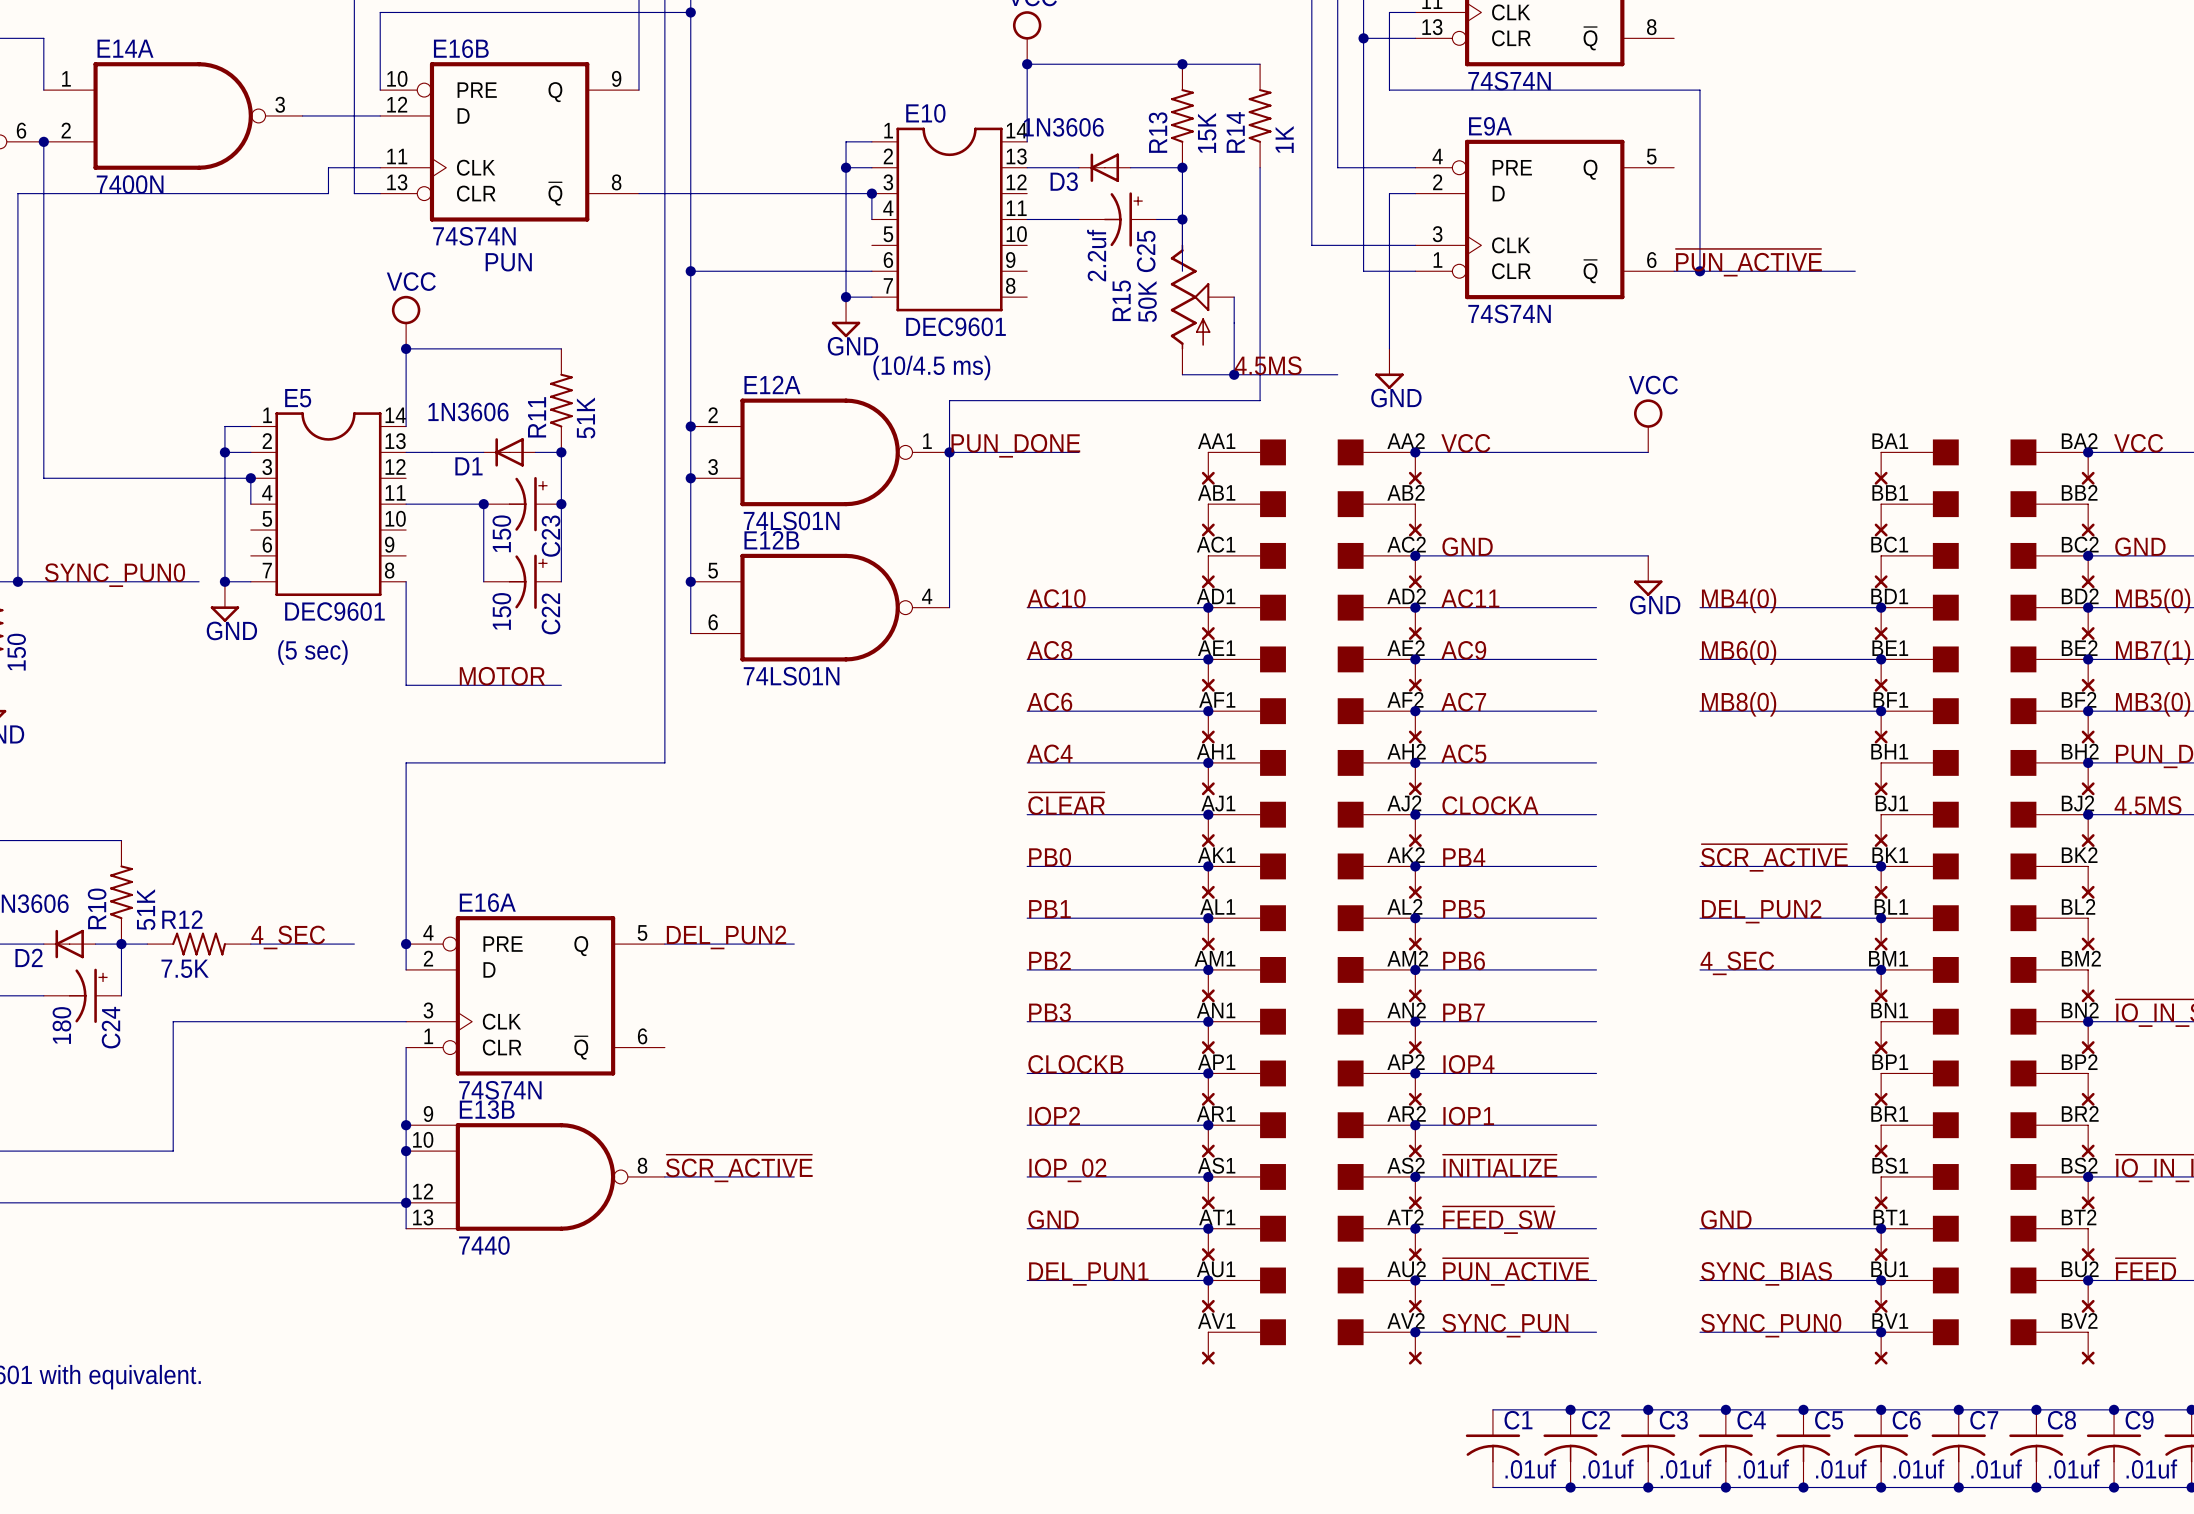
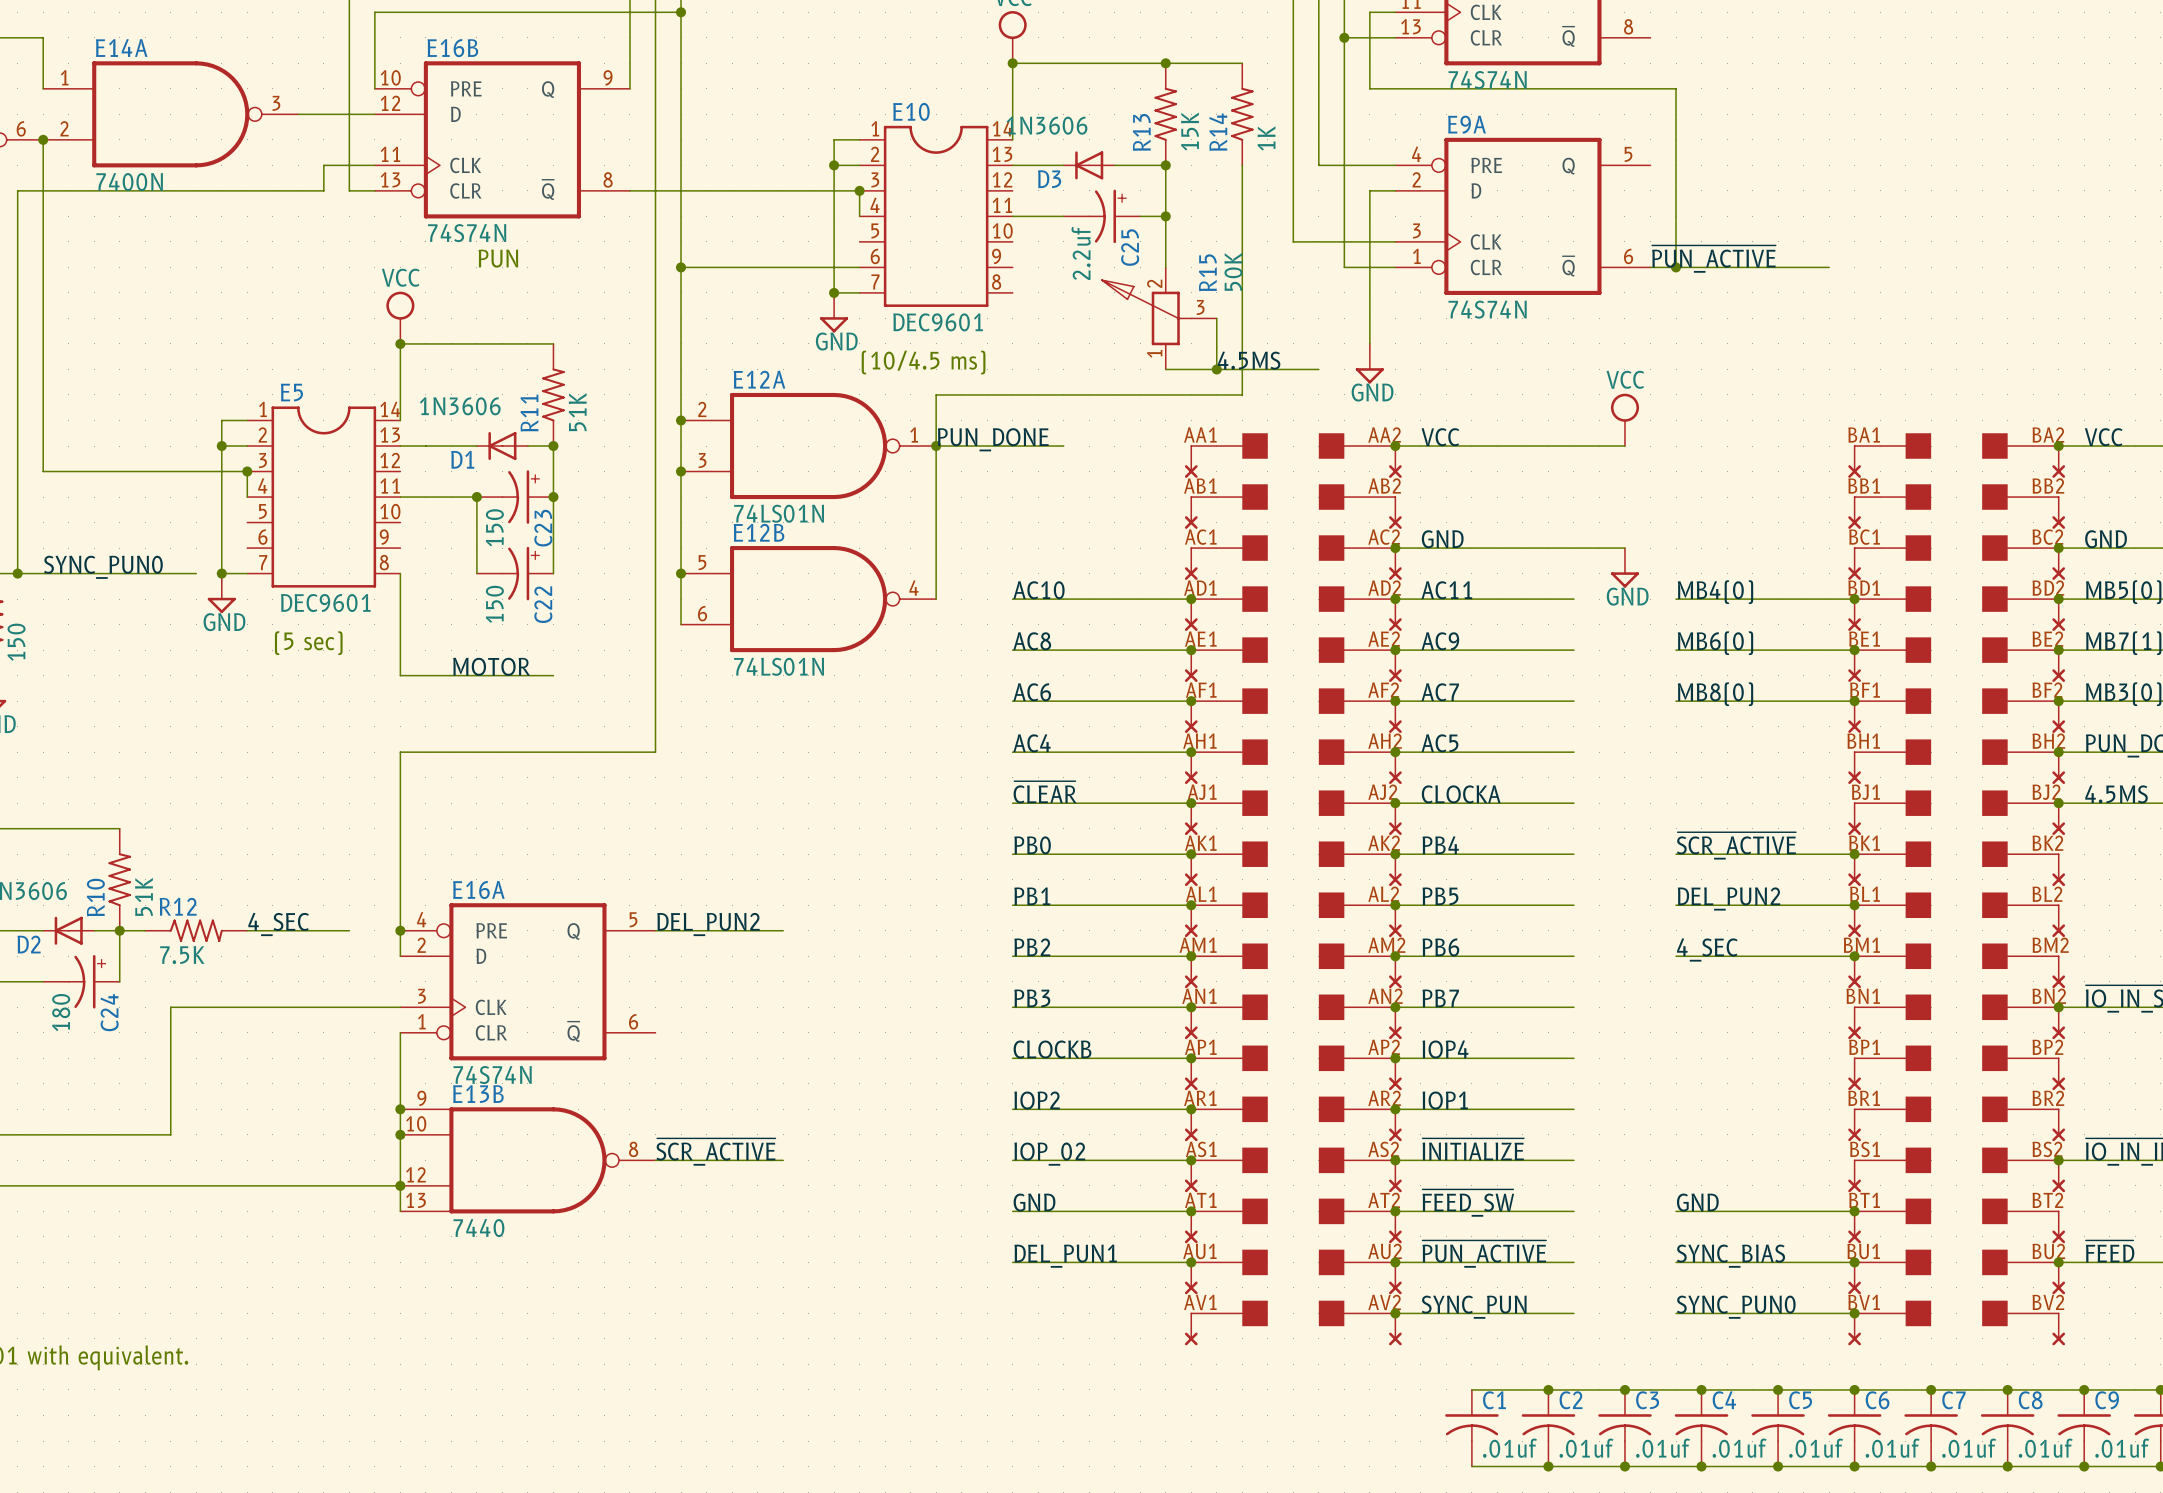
R15 symbol: [1170, 219, 1235, 375] -> [1101, 267, 1217, 370]
wire: (1234, 297) (1234, 323) -> none
R15 name position: R15 (1121, 300) -> R15 (1207, 272)
R15 value position: 50K (1147, 301) -> 50K (1233, 271)

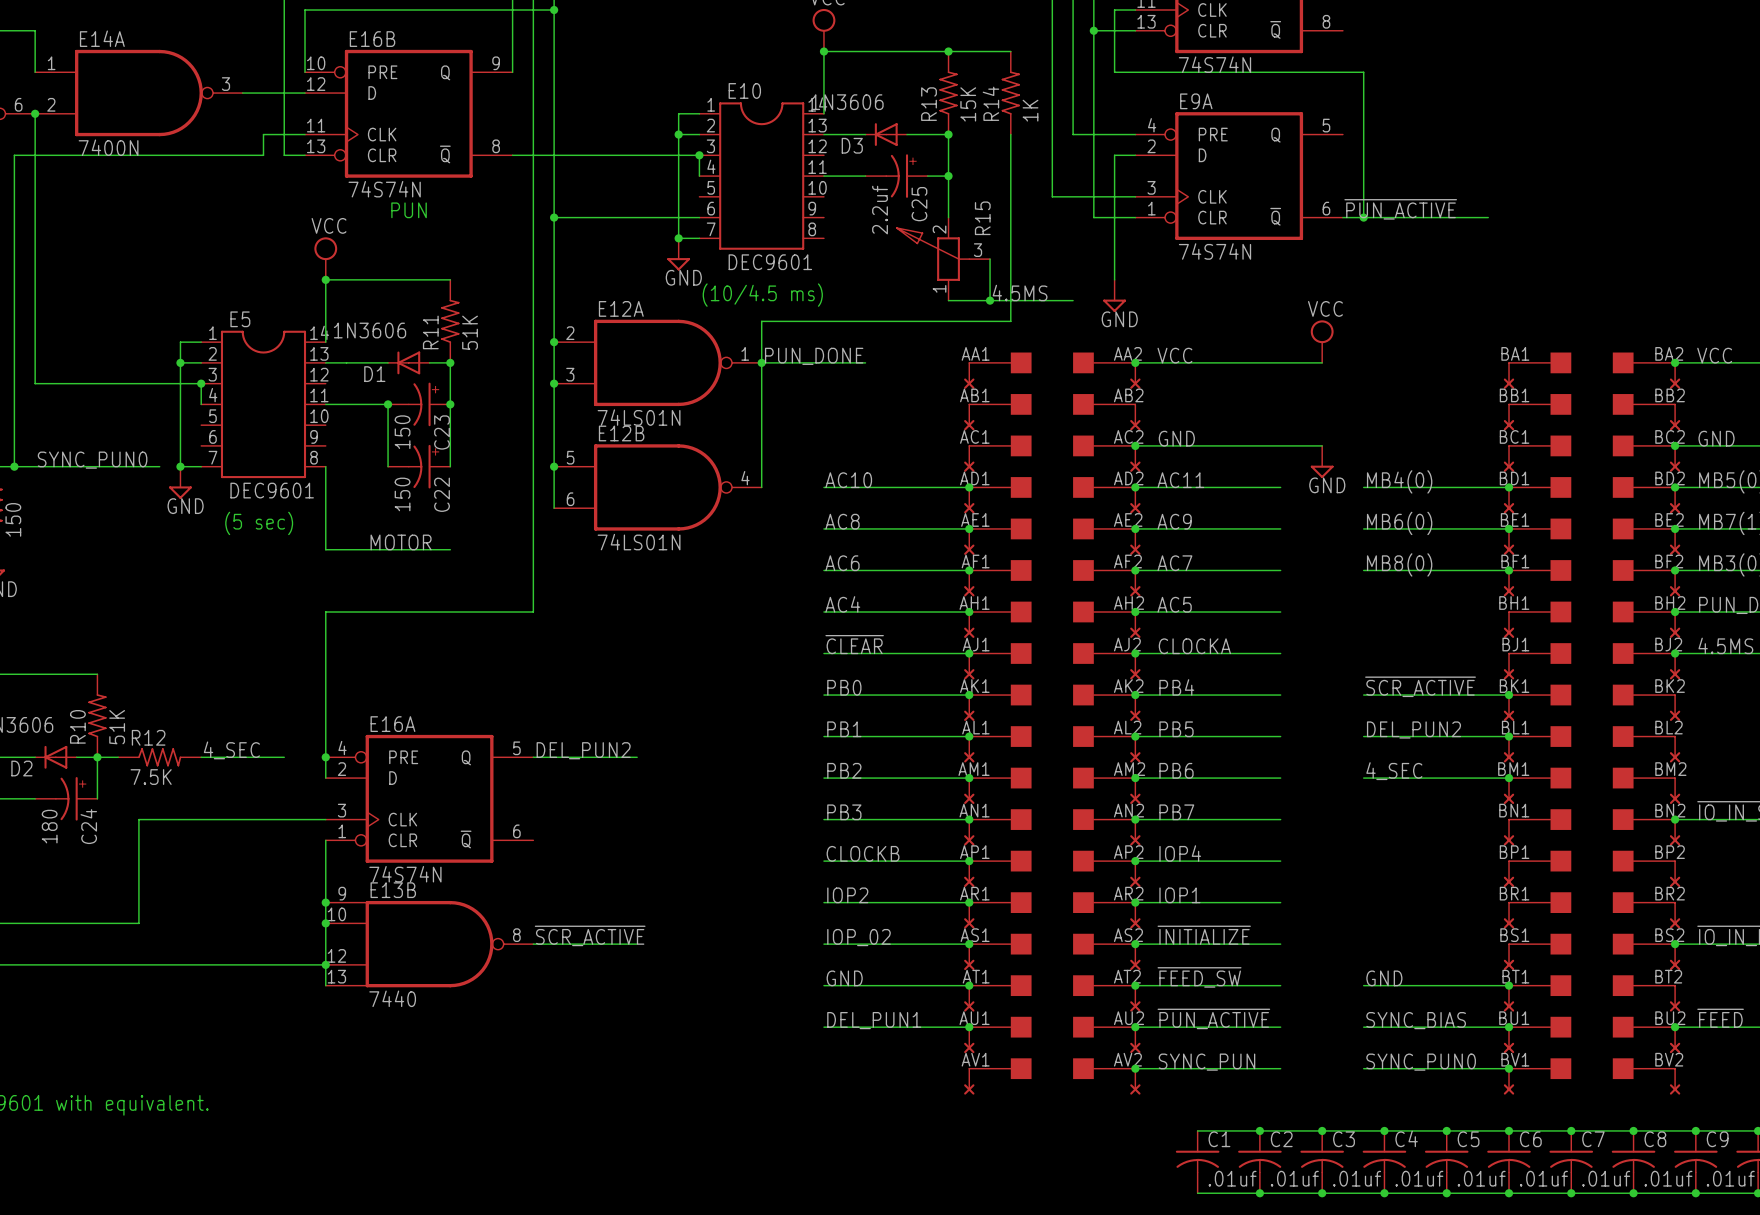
R15 value: 50K (1233, 271) -> none

